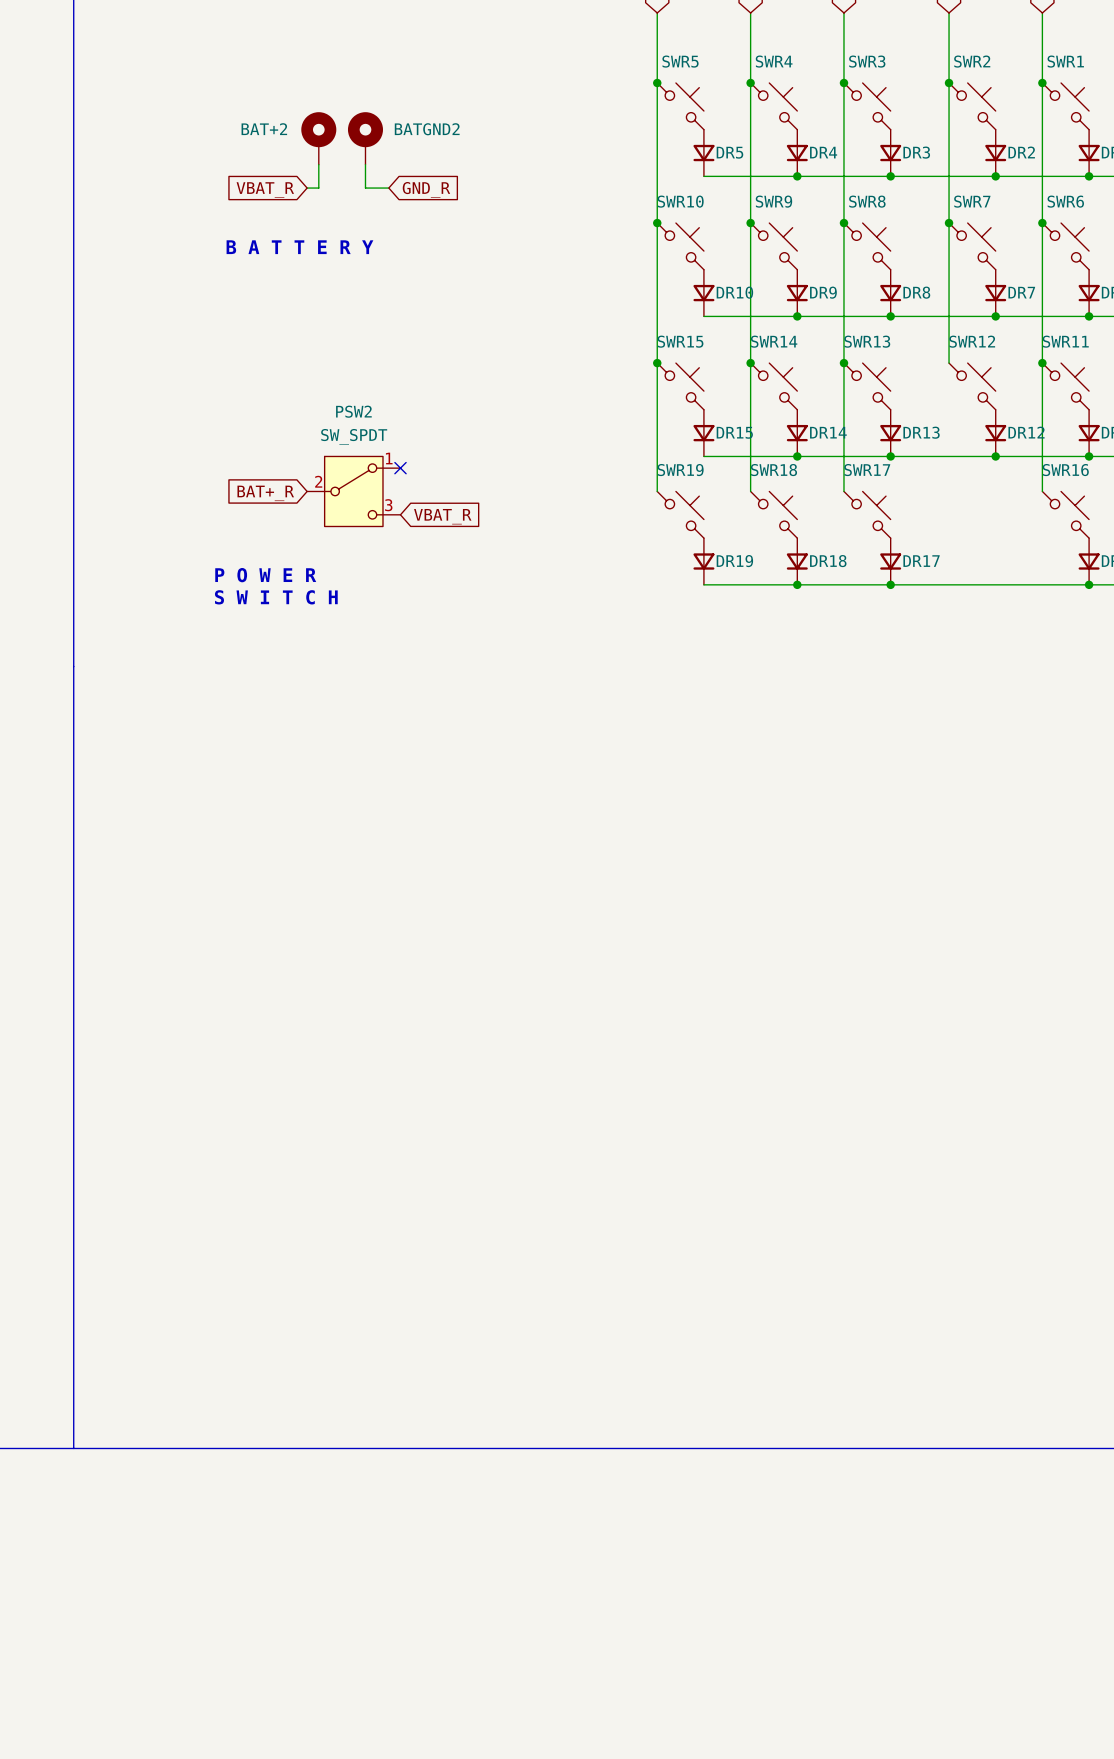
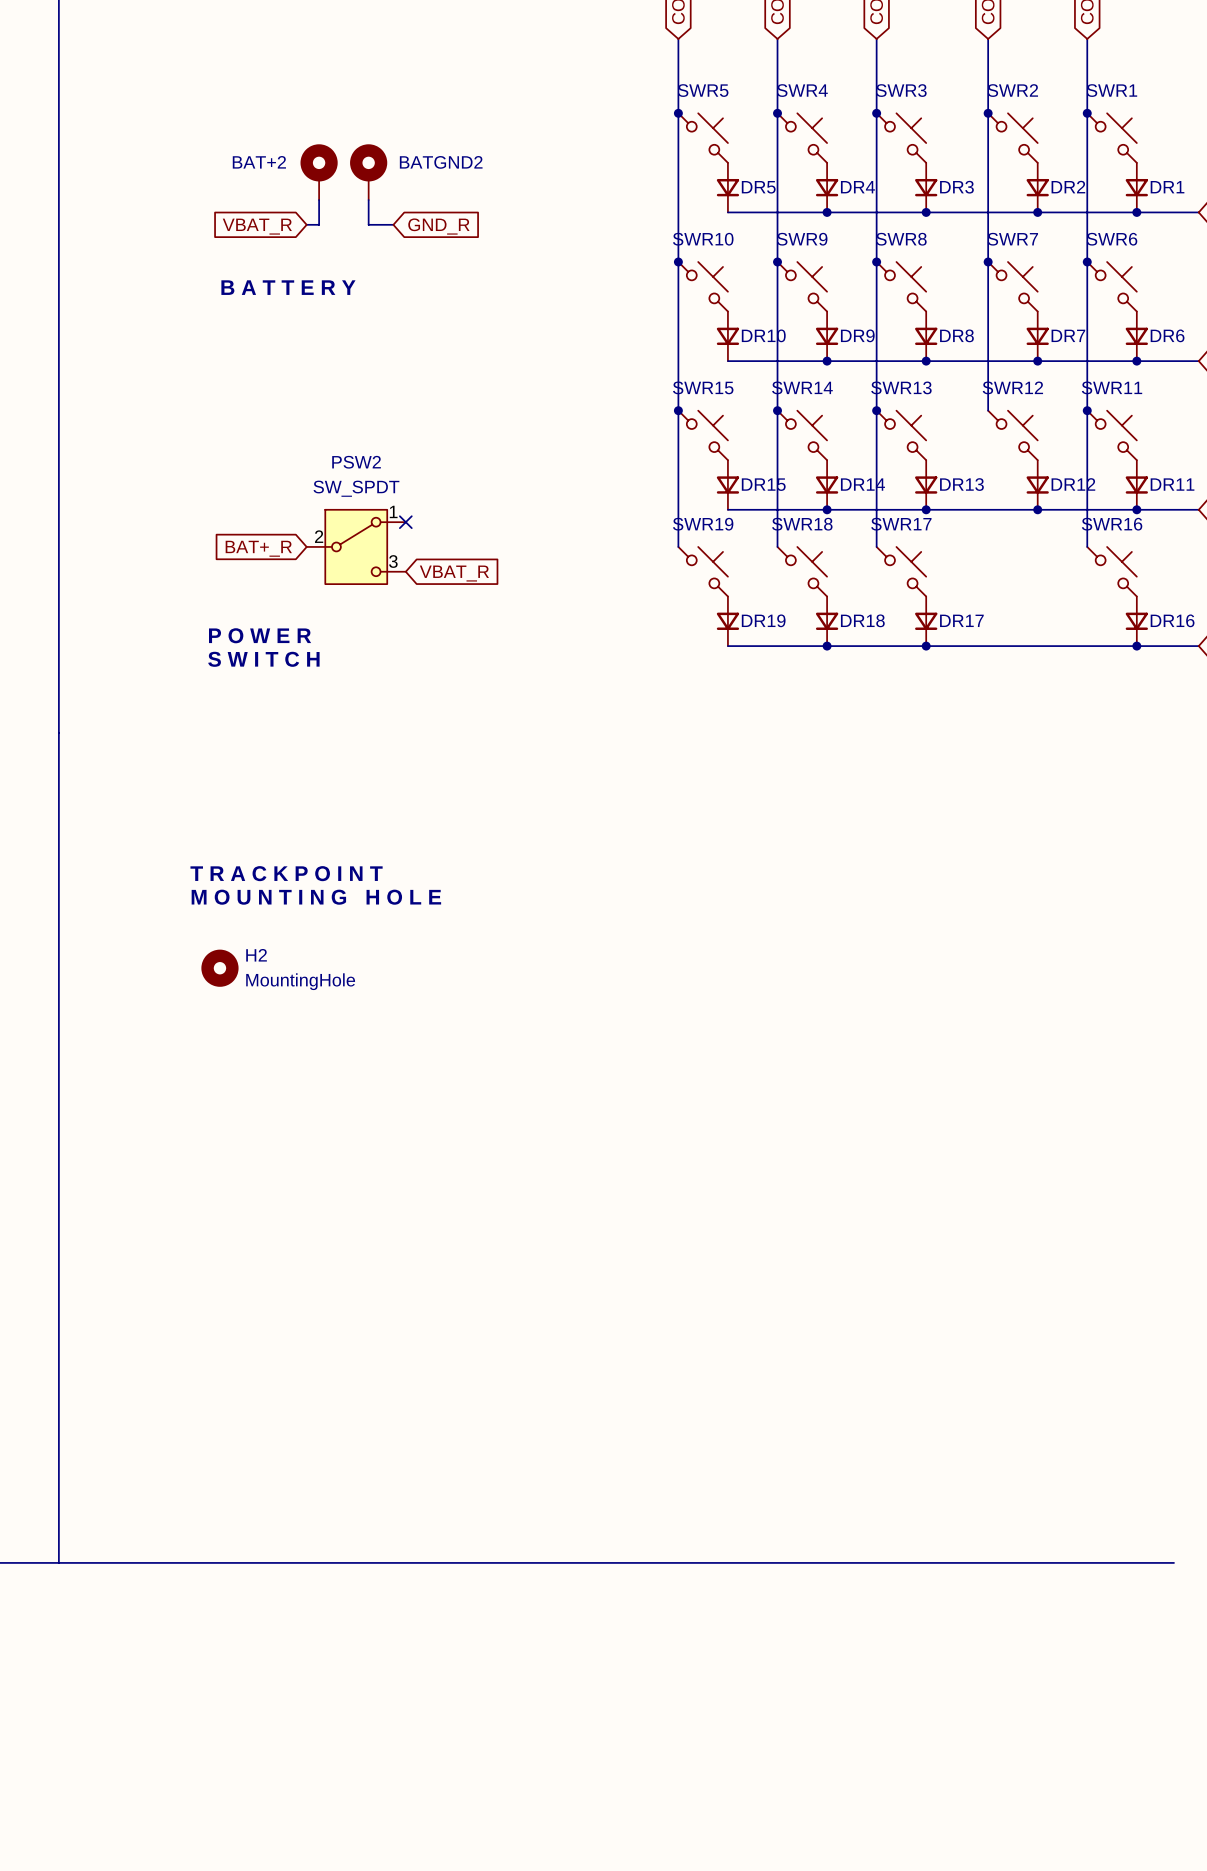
text: none -> T R A C K P O I N T (286, 873)
text: none -> M O U N T I N G H O L E (316, 897)
H2: none -> MountingHole (219, 968)

